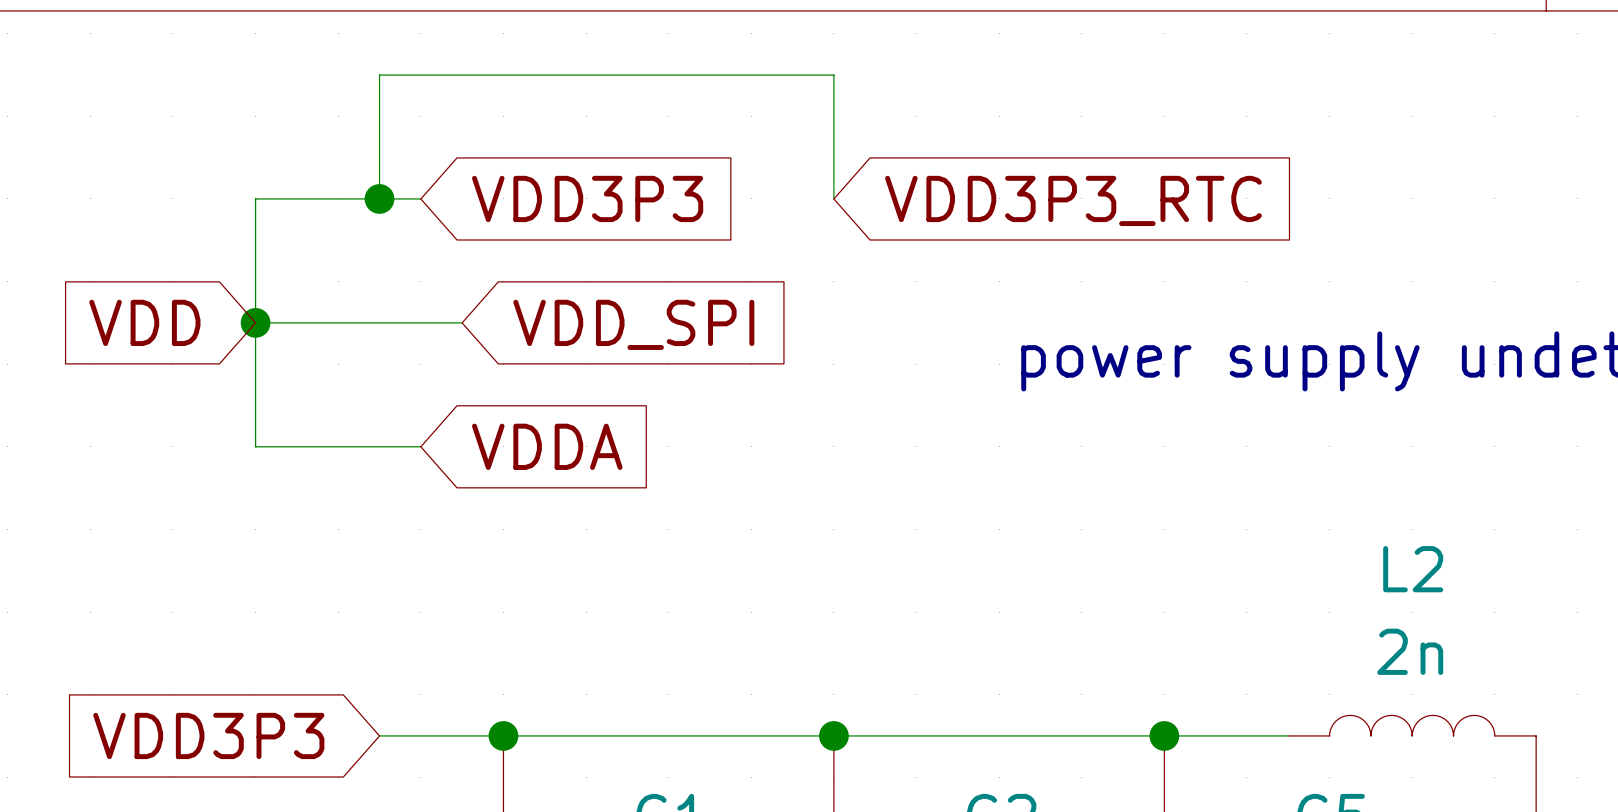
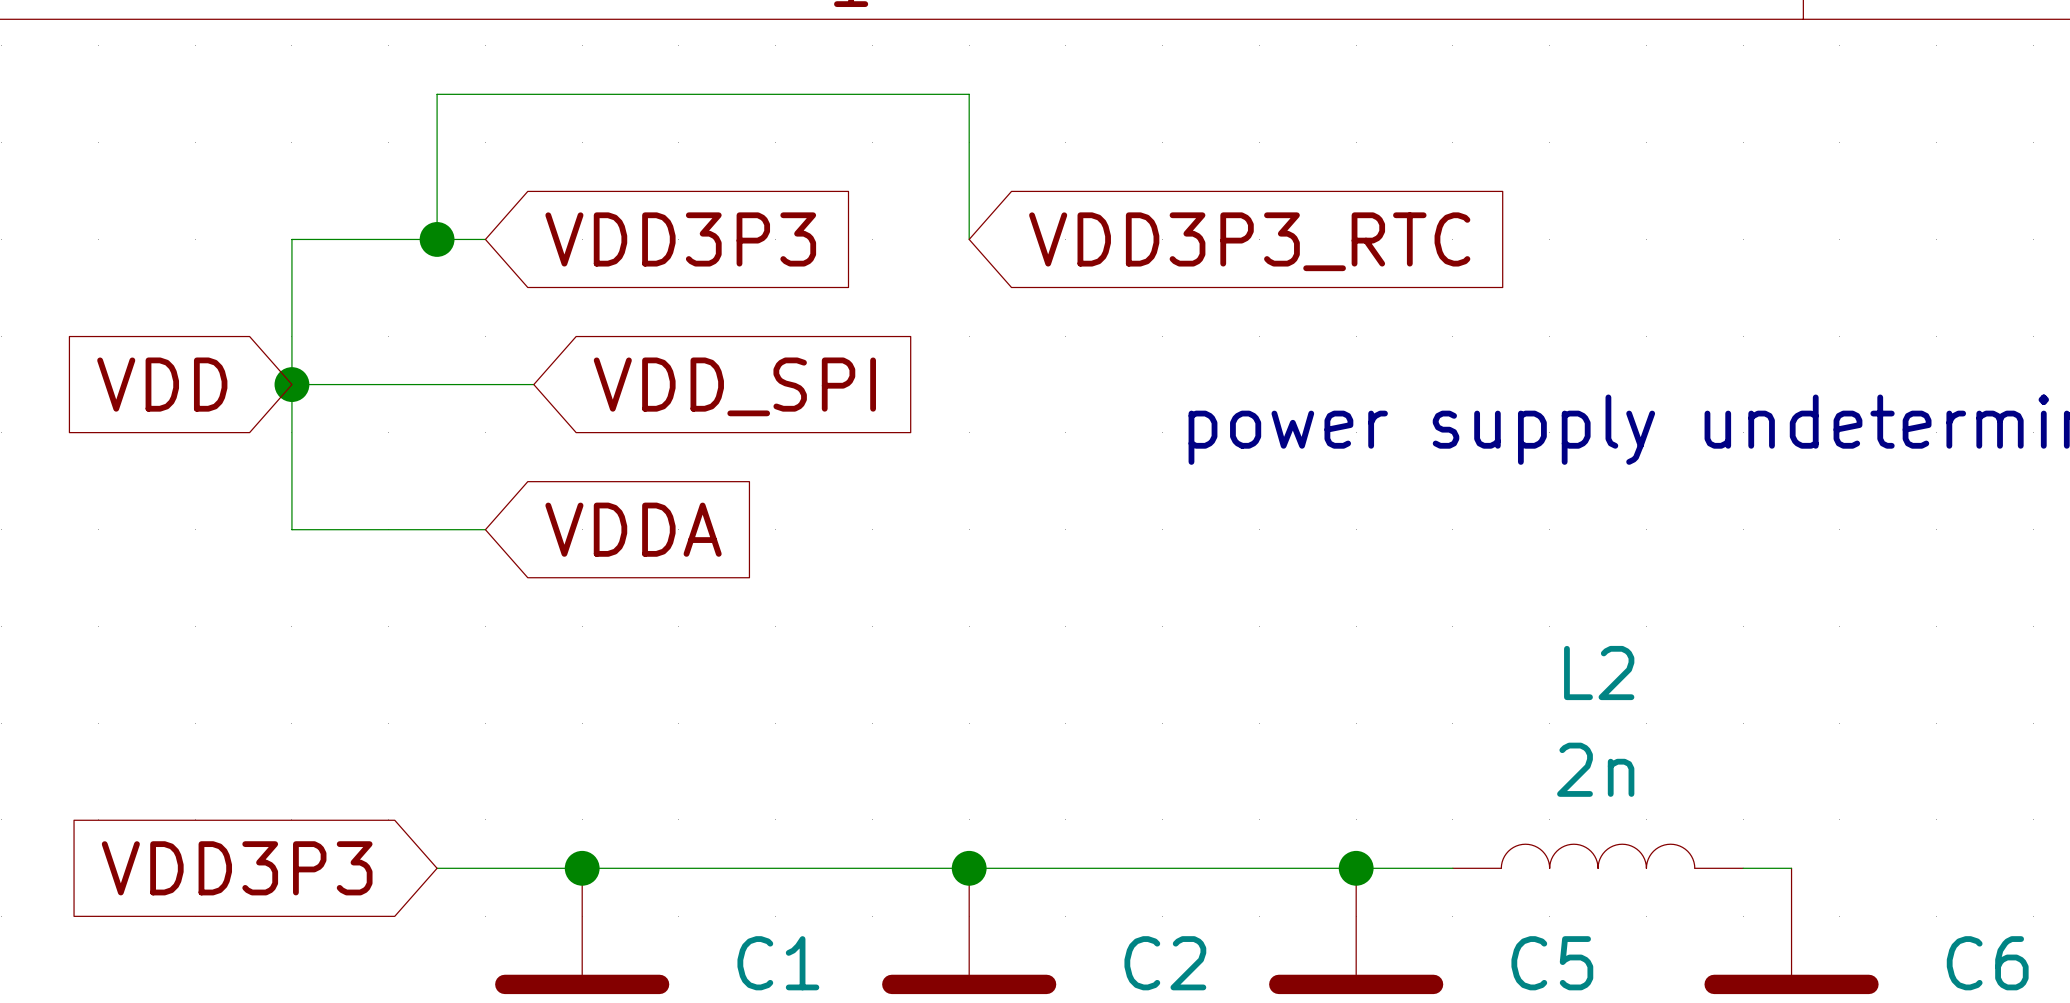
L2 position: (1412, 725) -> (1598, 856)

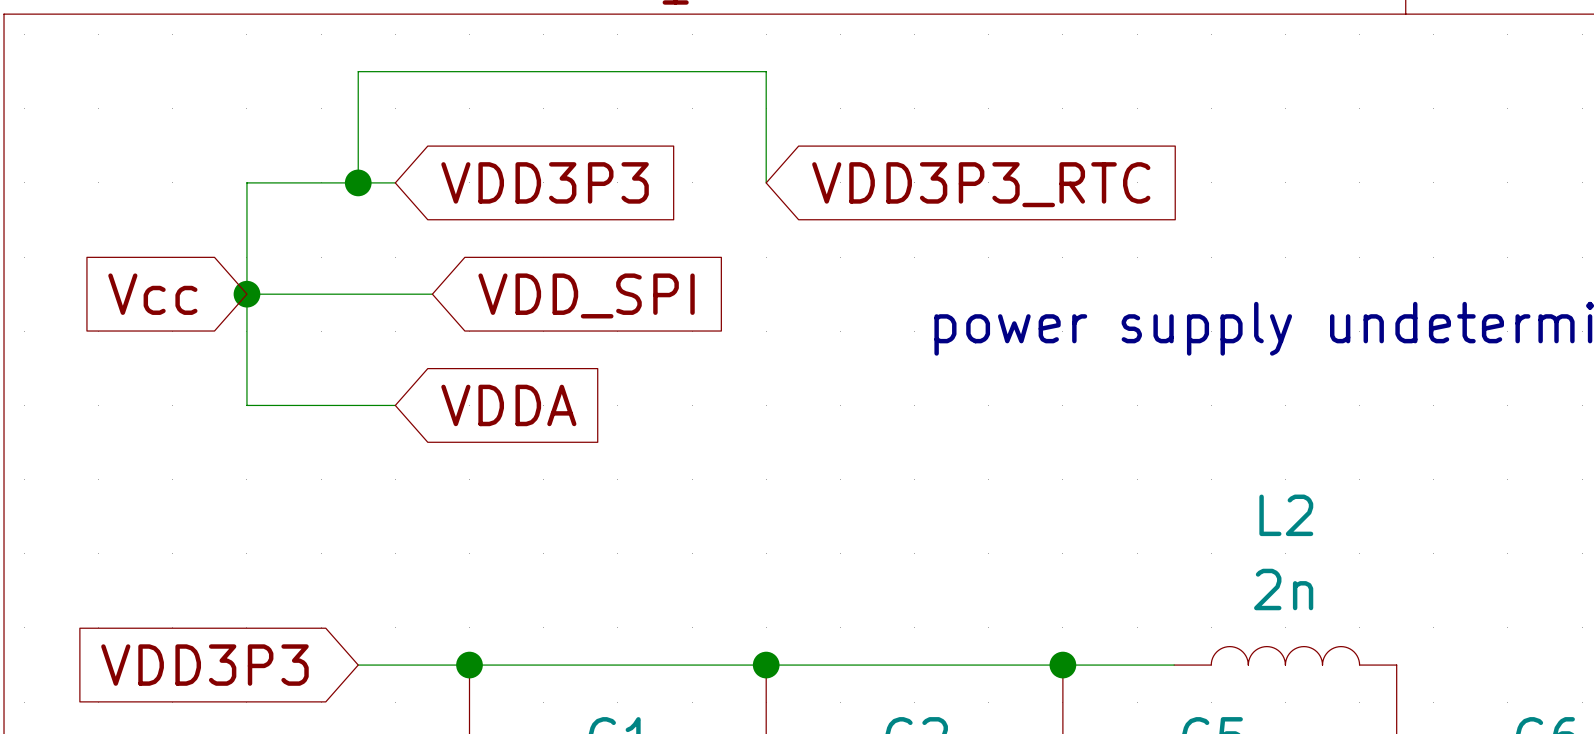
global label: VDD (162, 384) -> Vcc (152, 294)
L2 position: (1598, 856) -> (1285, 655)

